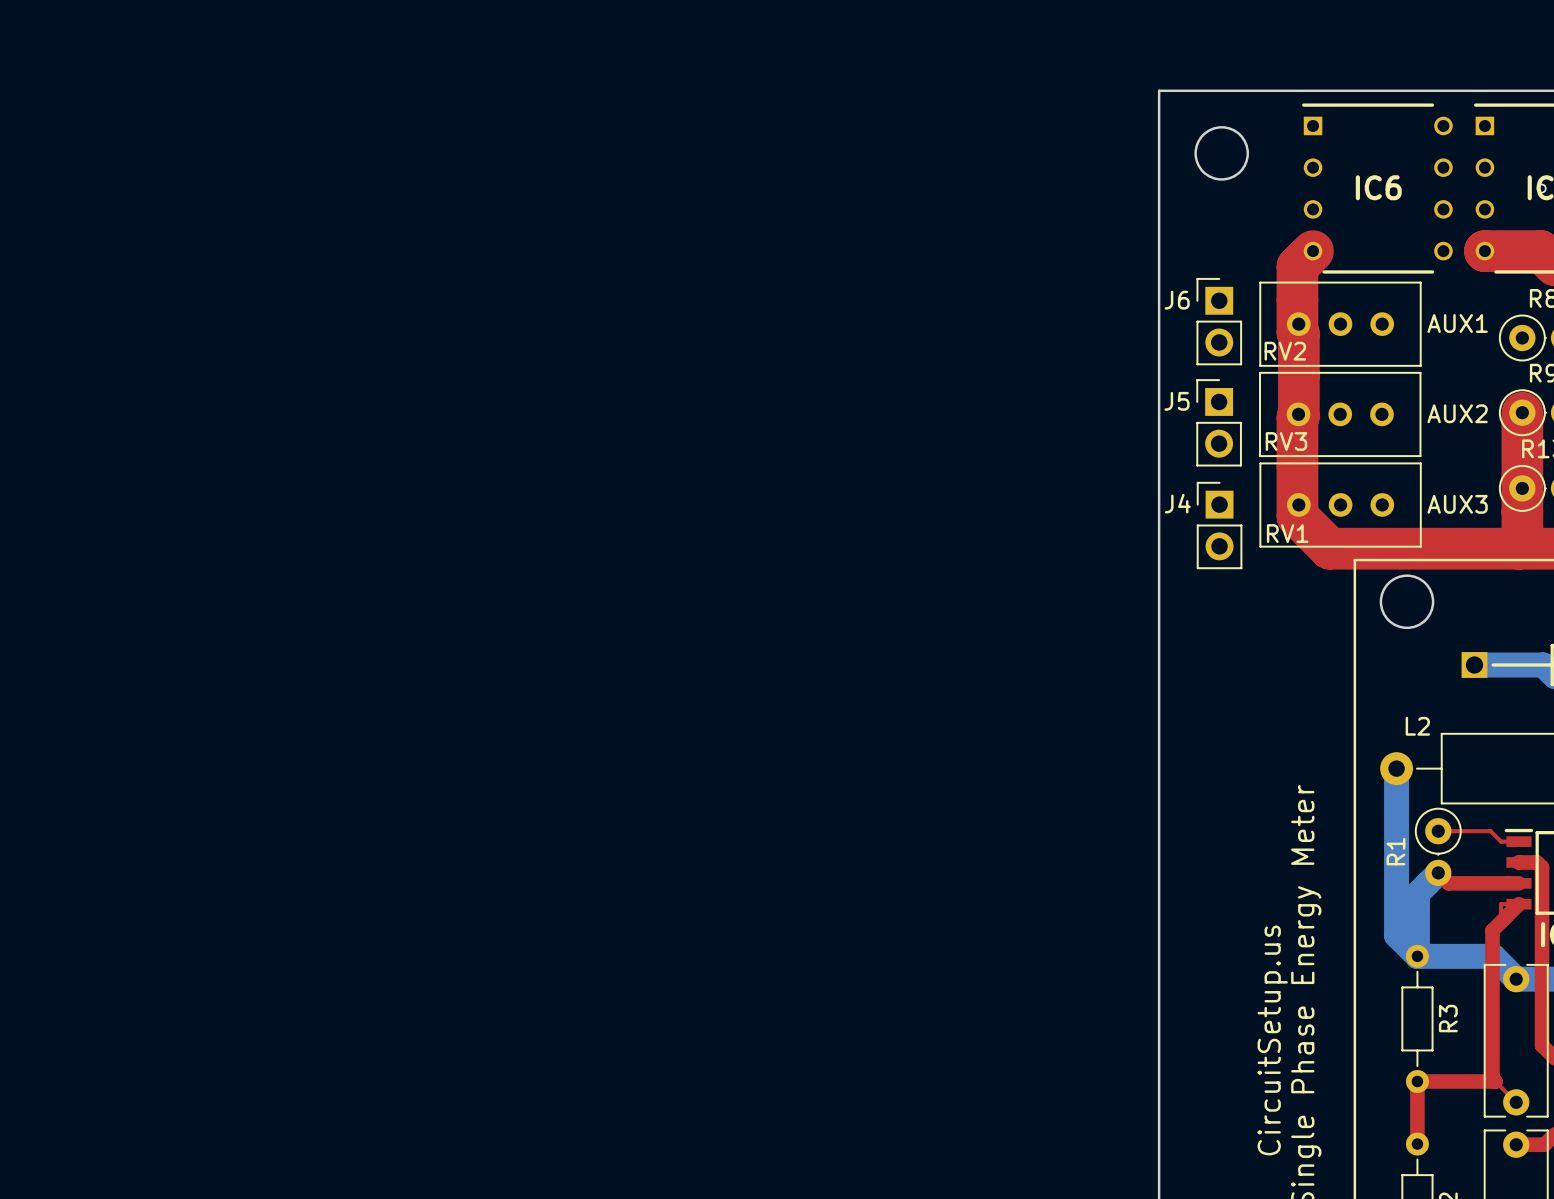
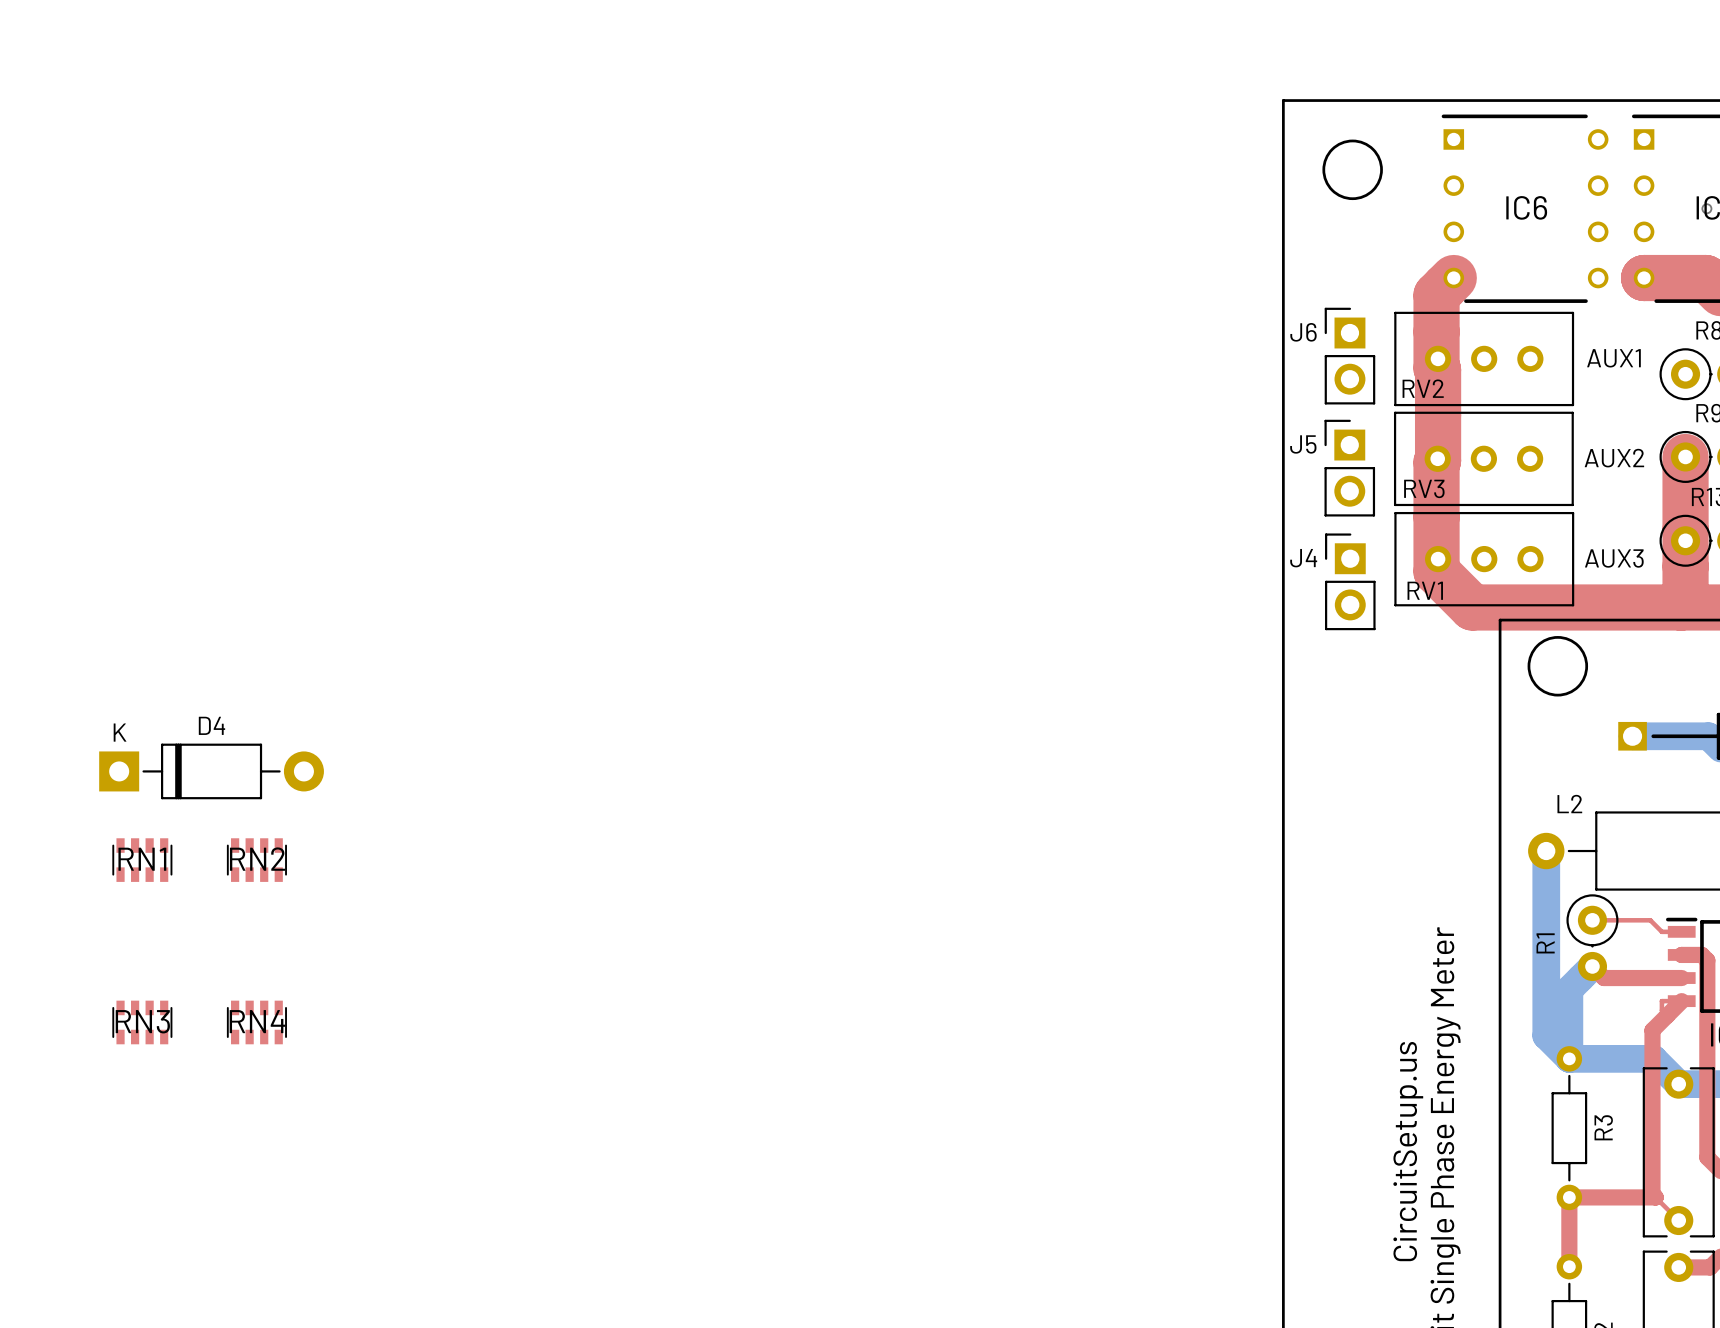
D4: none -> (211, 771)
RN1: none -> (142, 860)
RN2: none -> (256, 860)
RN3: none -> (142, 1022)
RN4: none -> (256, 1022)

